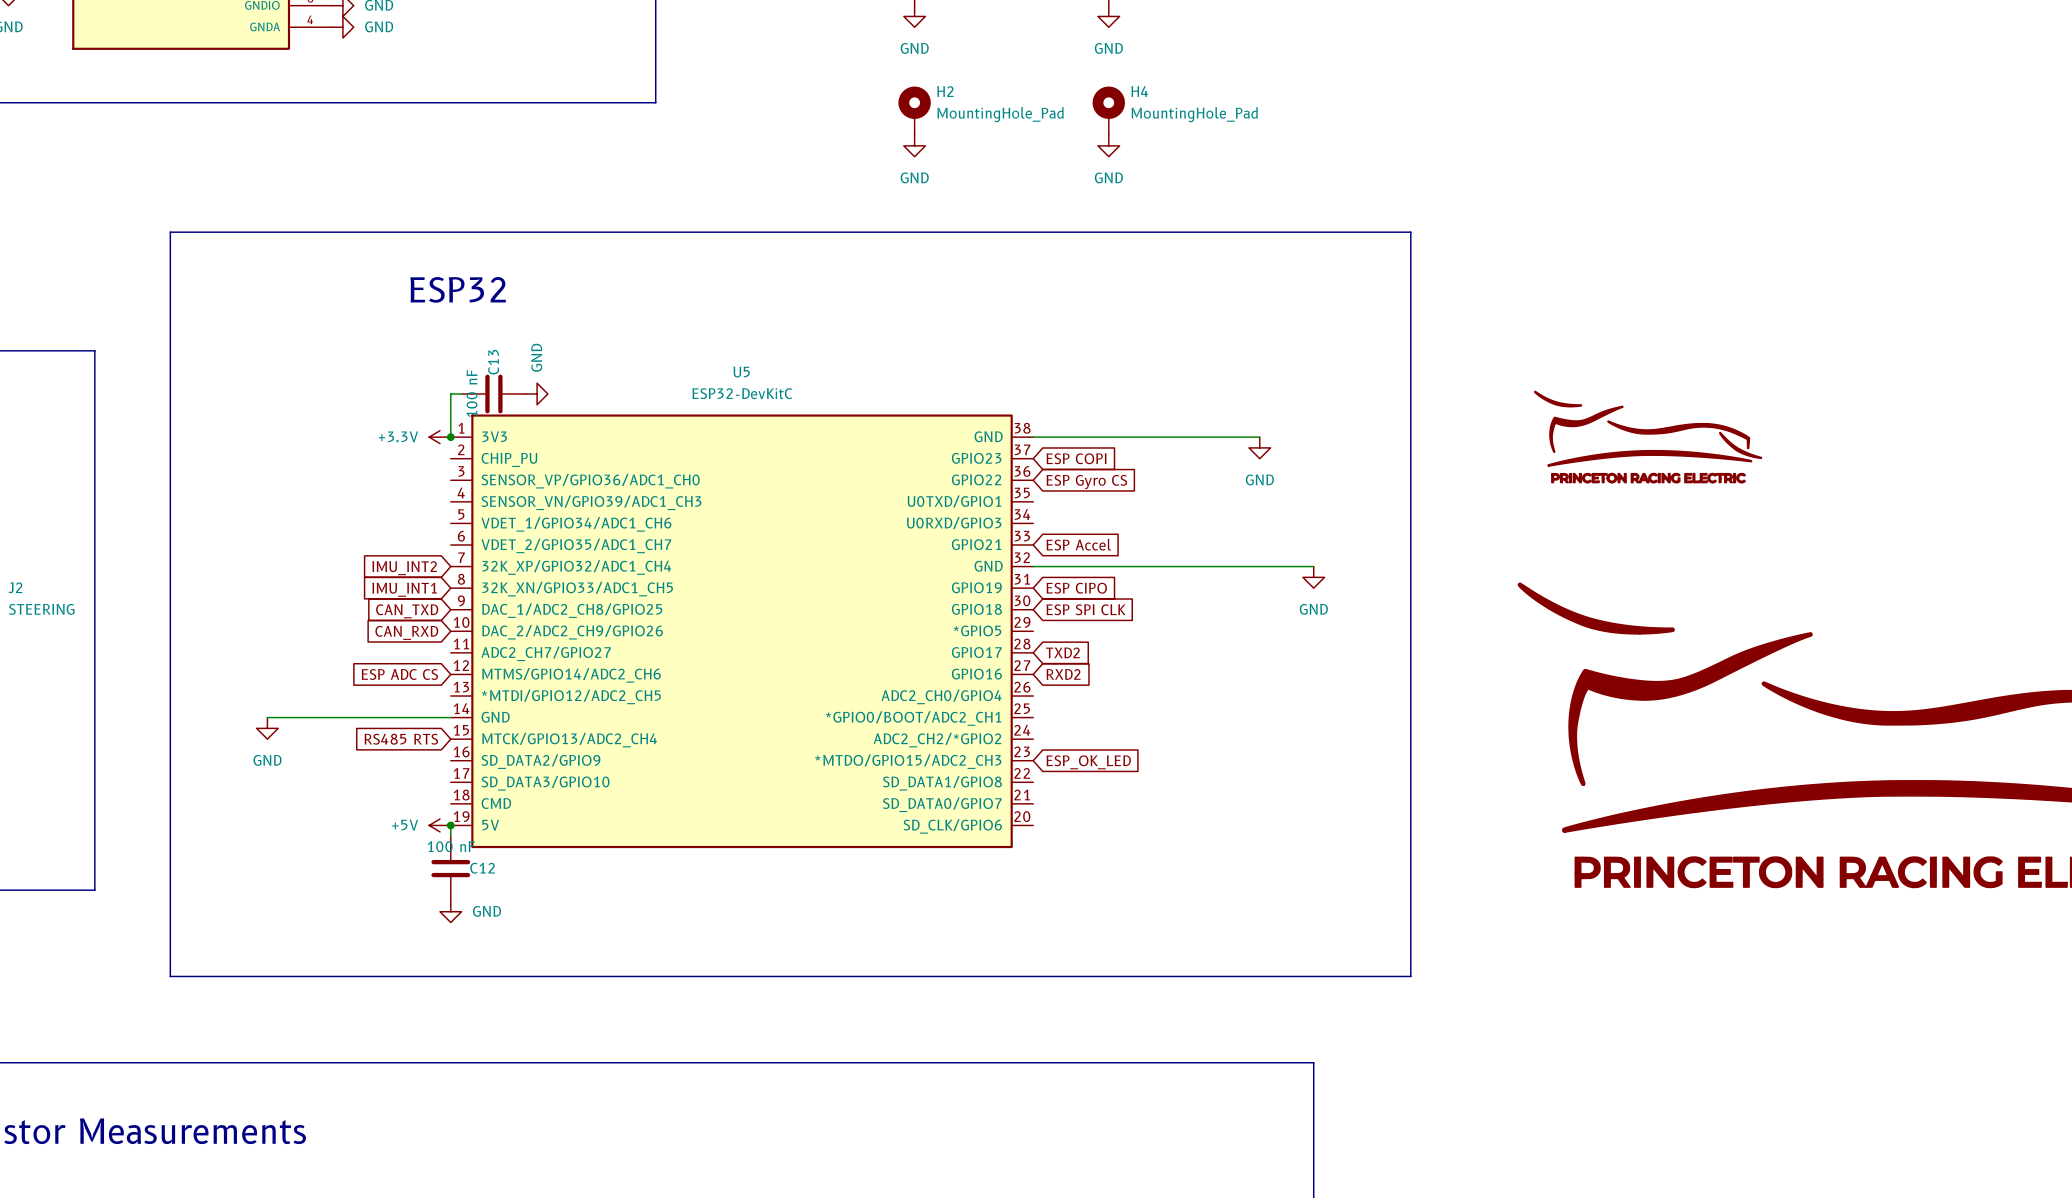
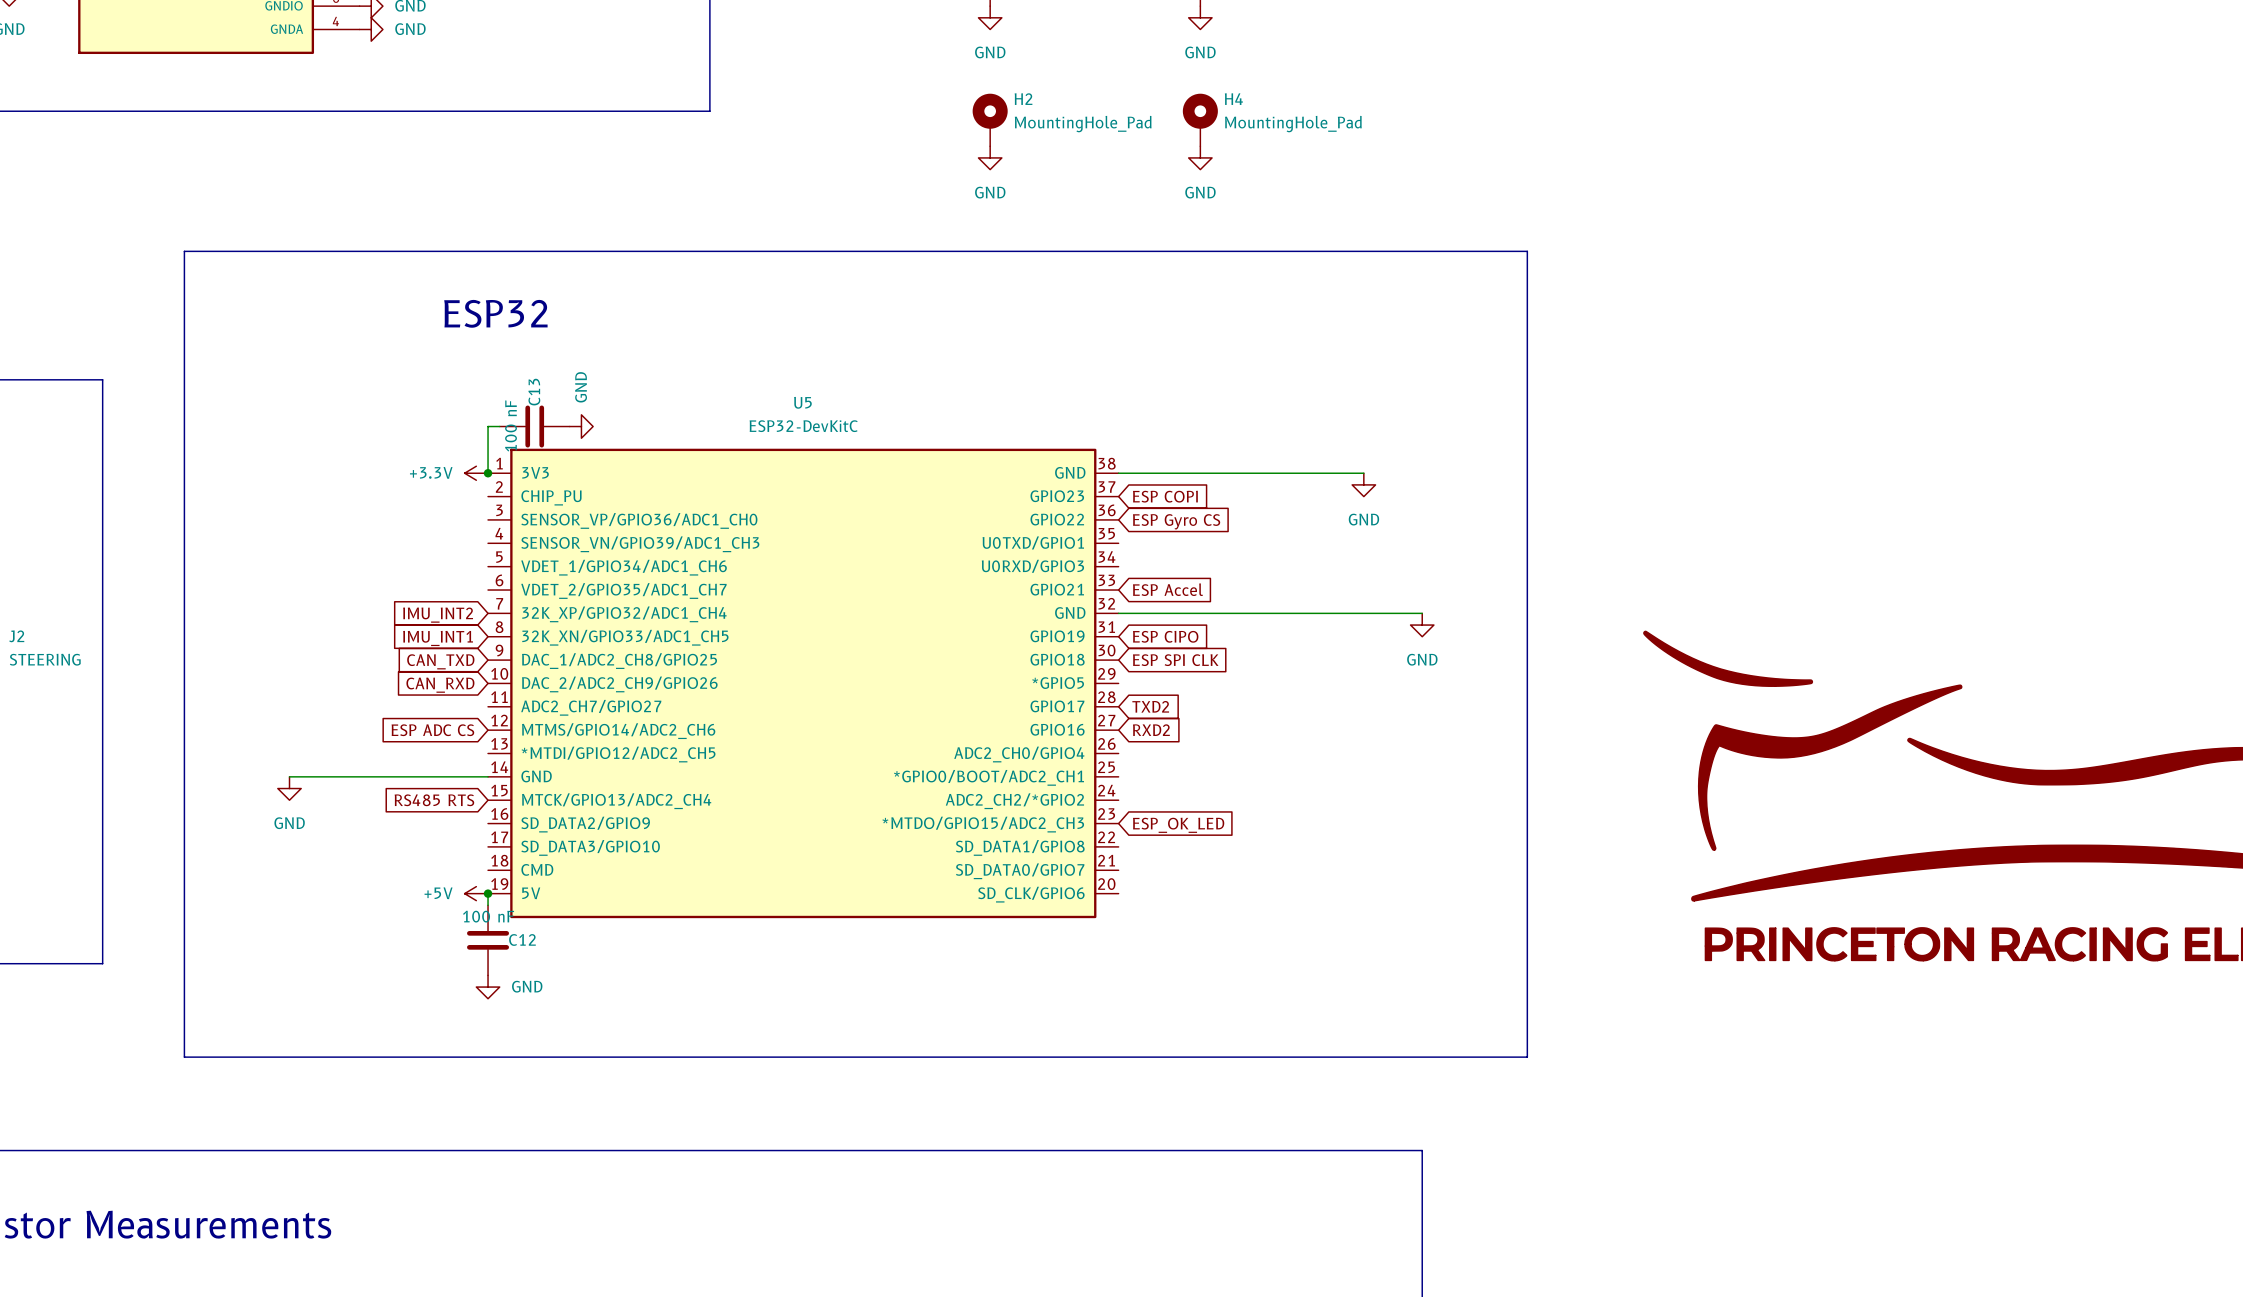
part: (1648, 437) -> none

